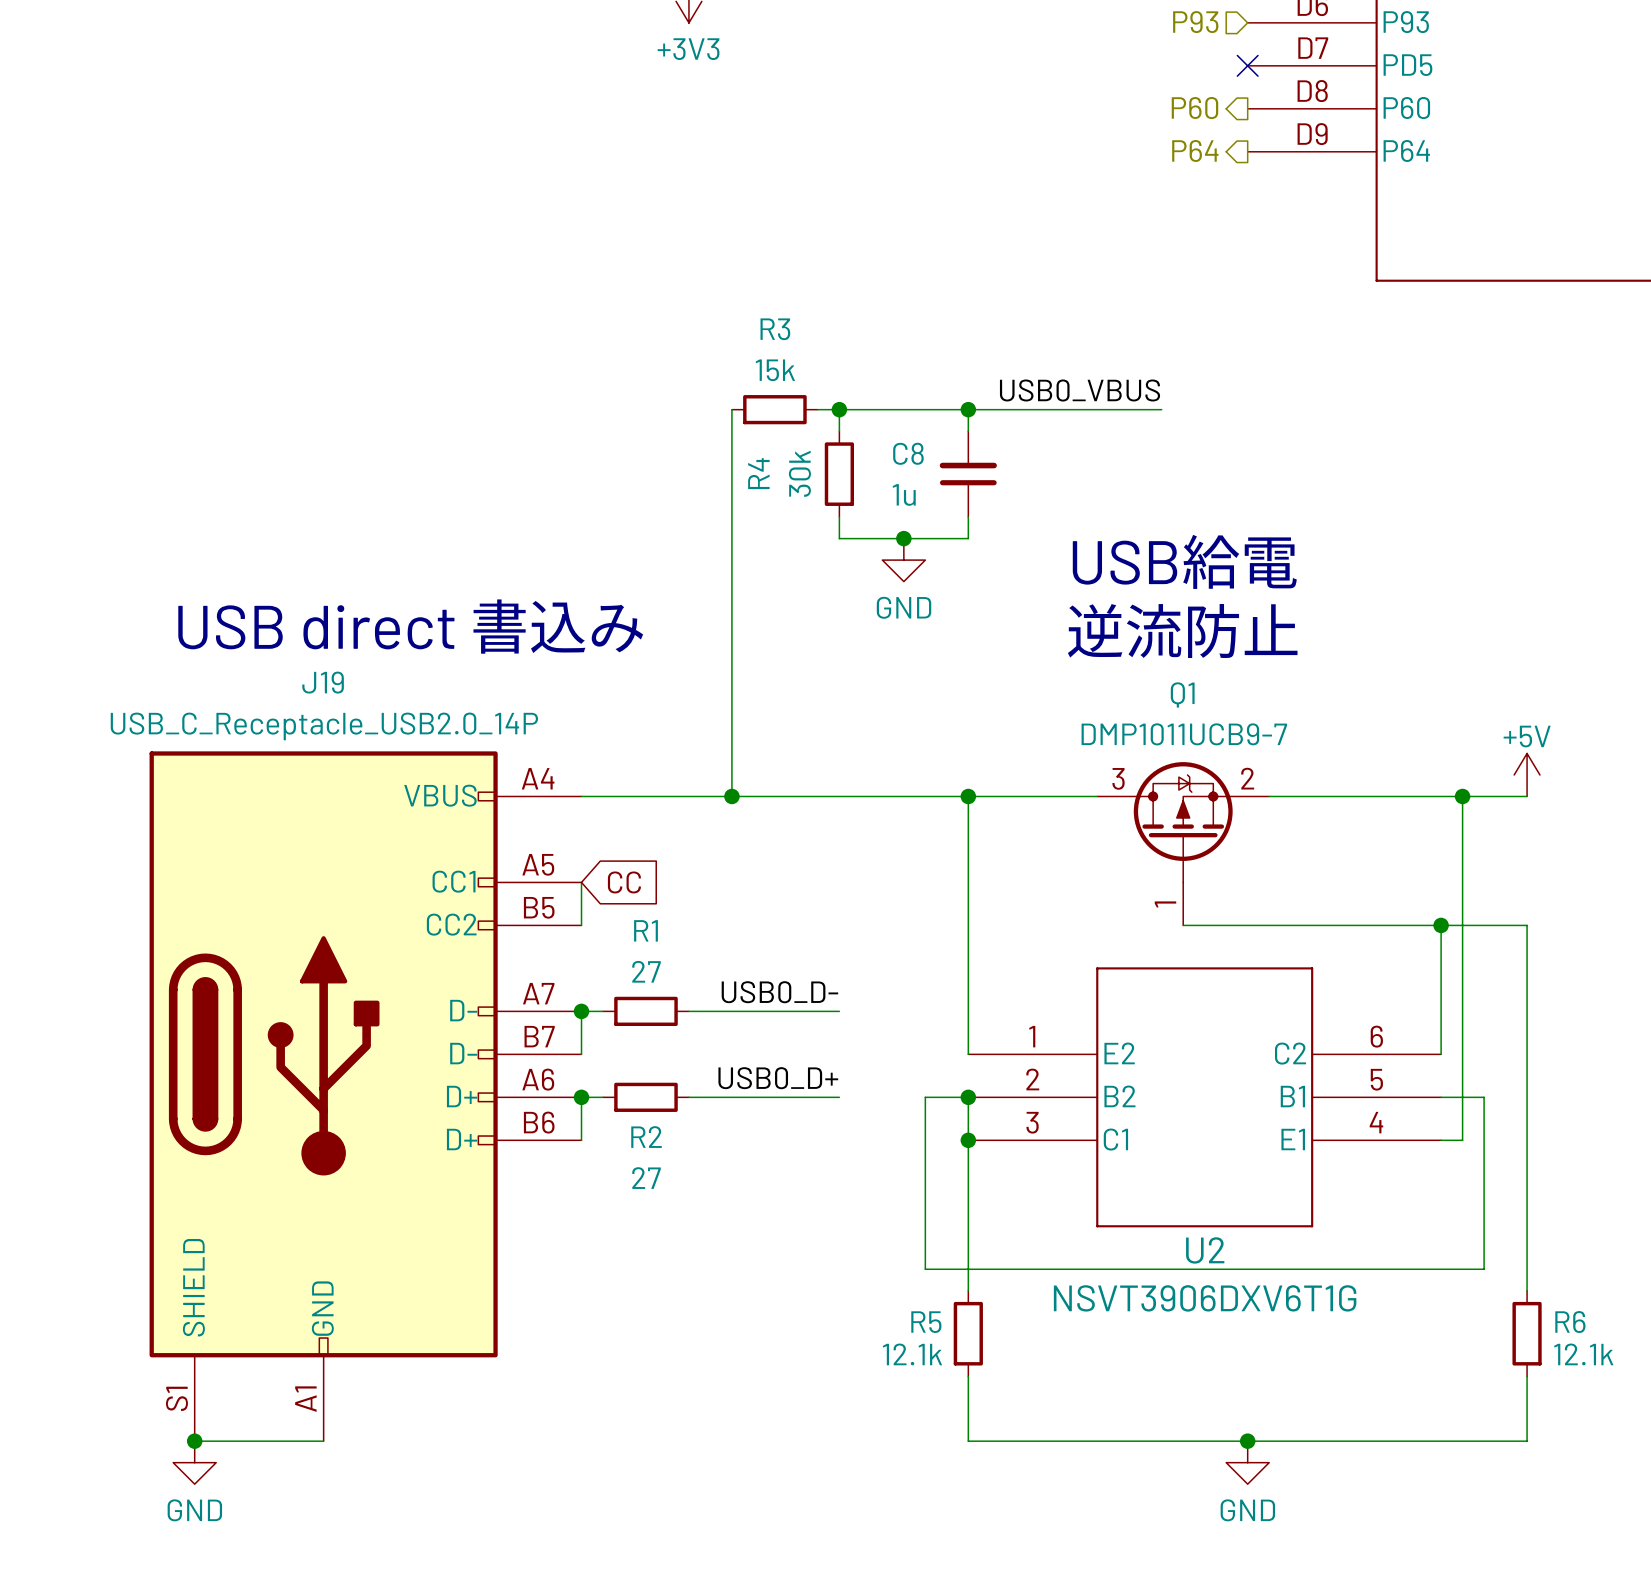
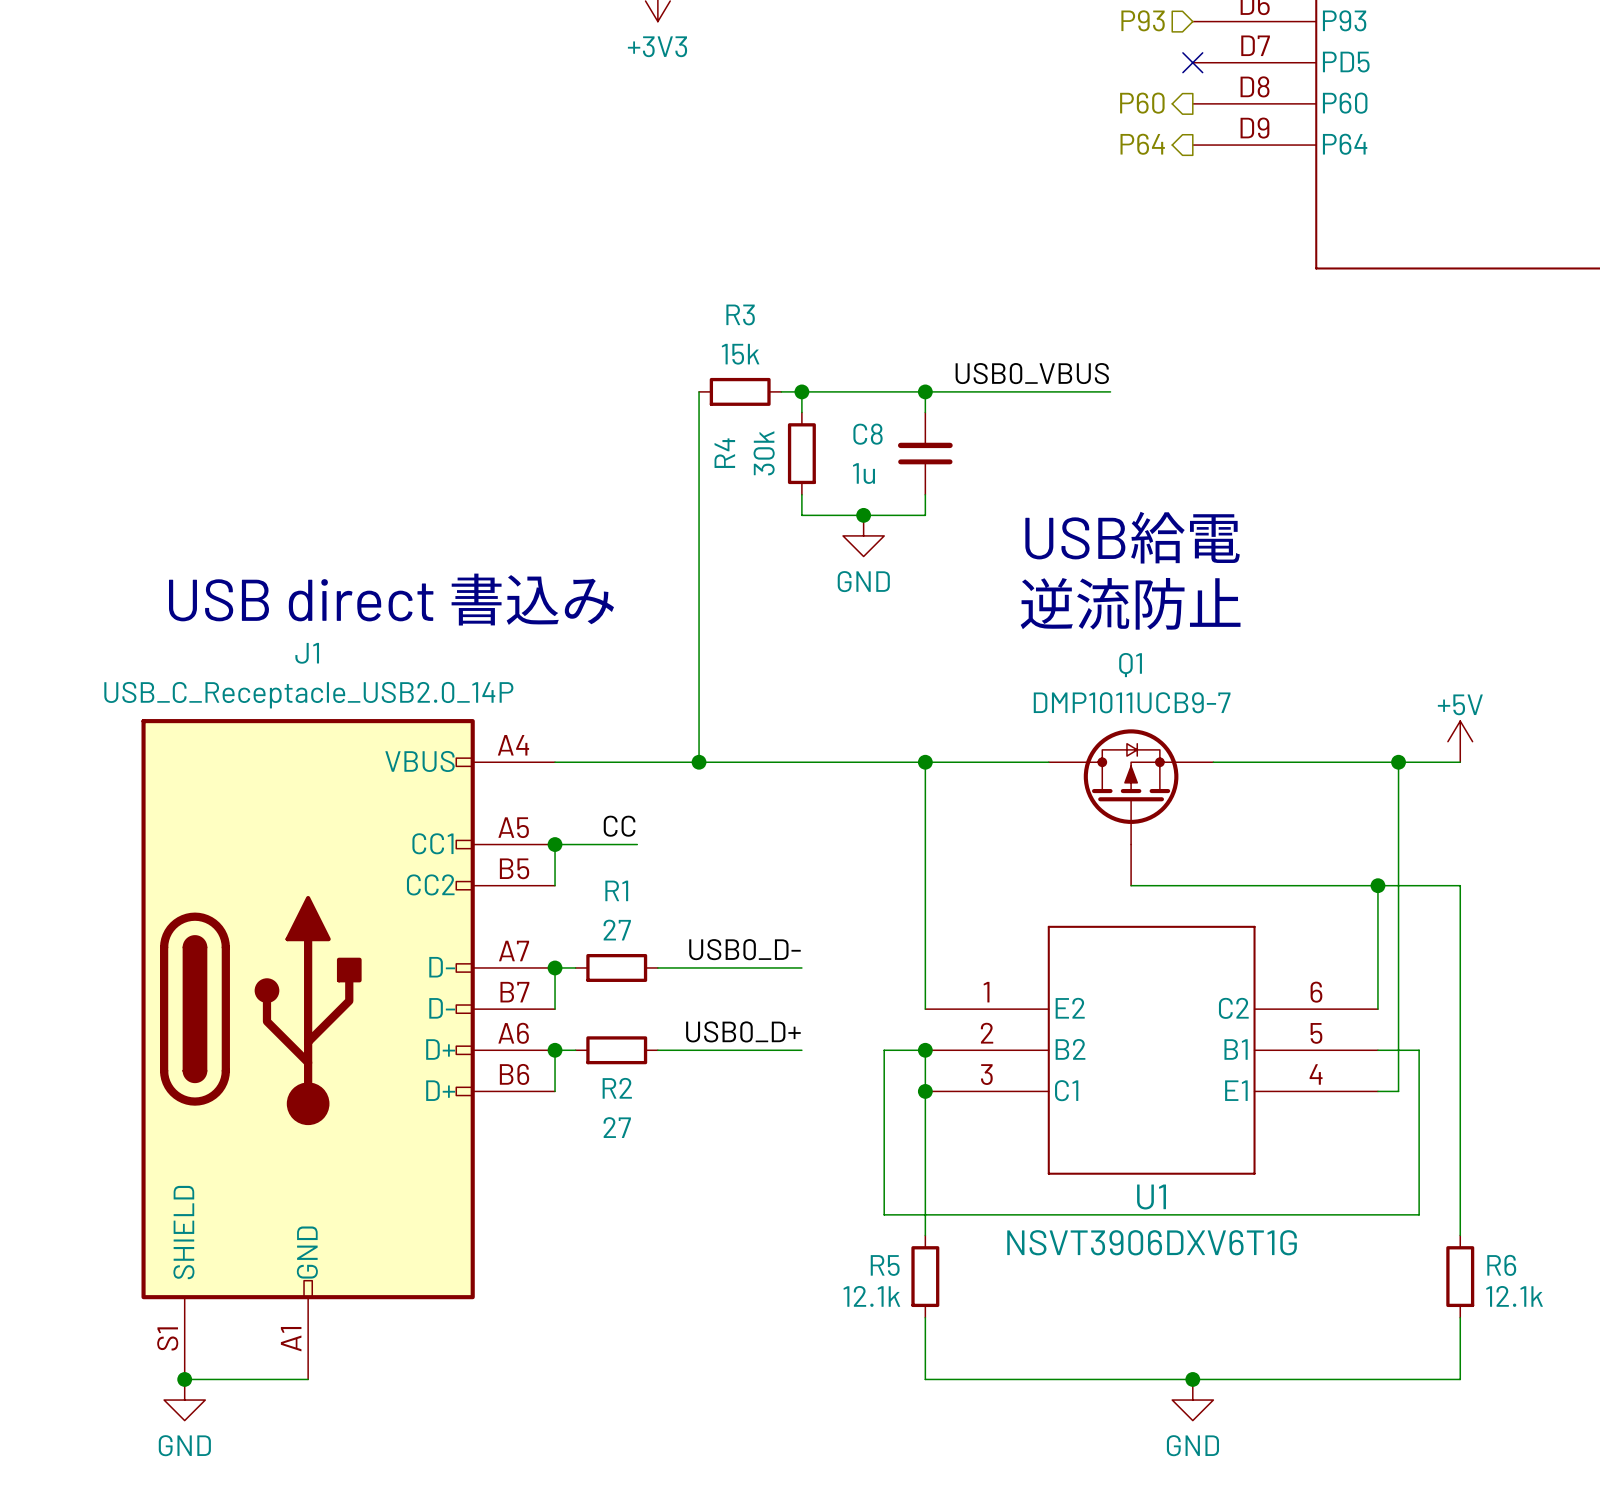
J19 name: J19 (323, 682) -> J1 (307, 653)
Q1 symbol: [1097, 762, 1270, 926] -> [1048, 729, 1214, 886]
label: none -> CC (619, 826)
wire: none -> (555, 844) (637, 844)
junction: none -> (555, 844)
global label: CC (624, 882) -> none
U2 name: U2 (1205, 1250) -> U1 (1151, 1196)

